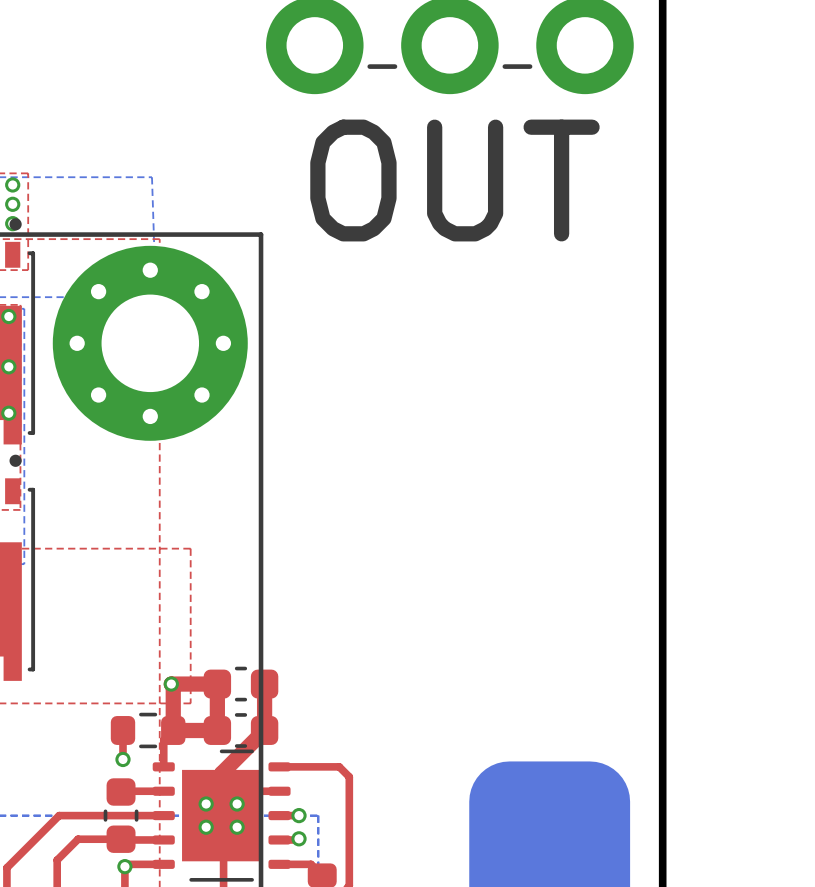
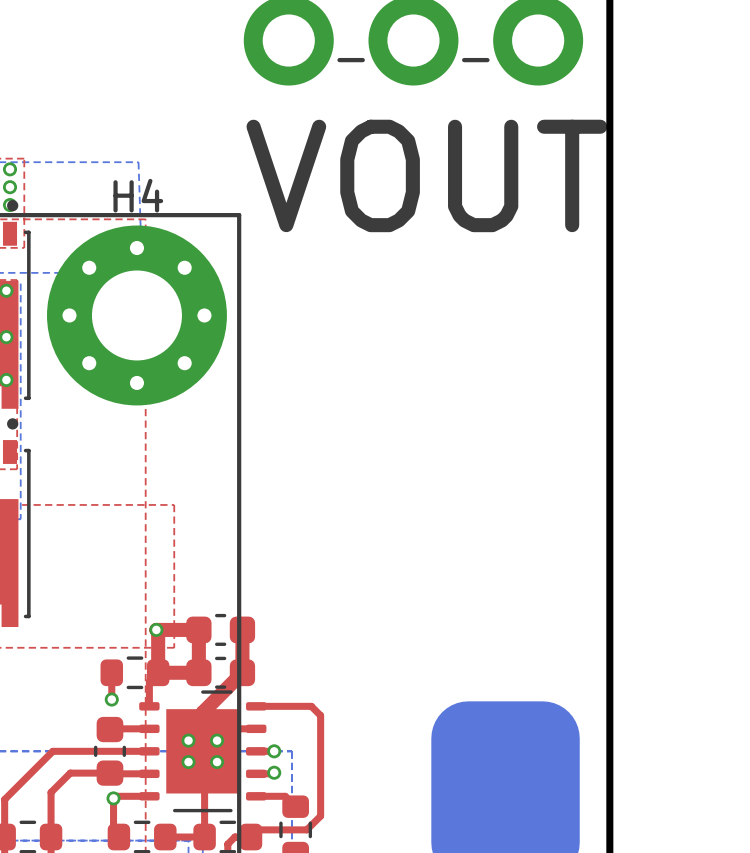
text: OUT (454, 180) -> VOUT (426, 175)
H4 name: none -> H4 (138, 195)

